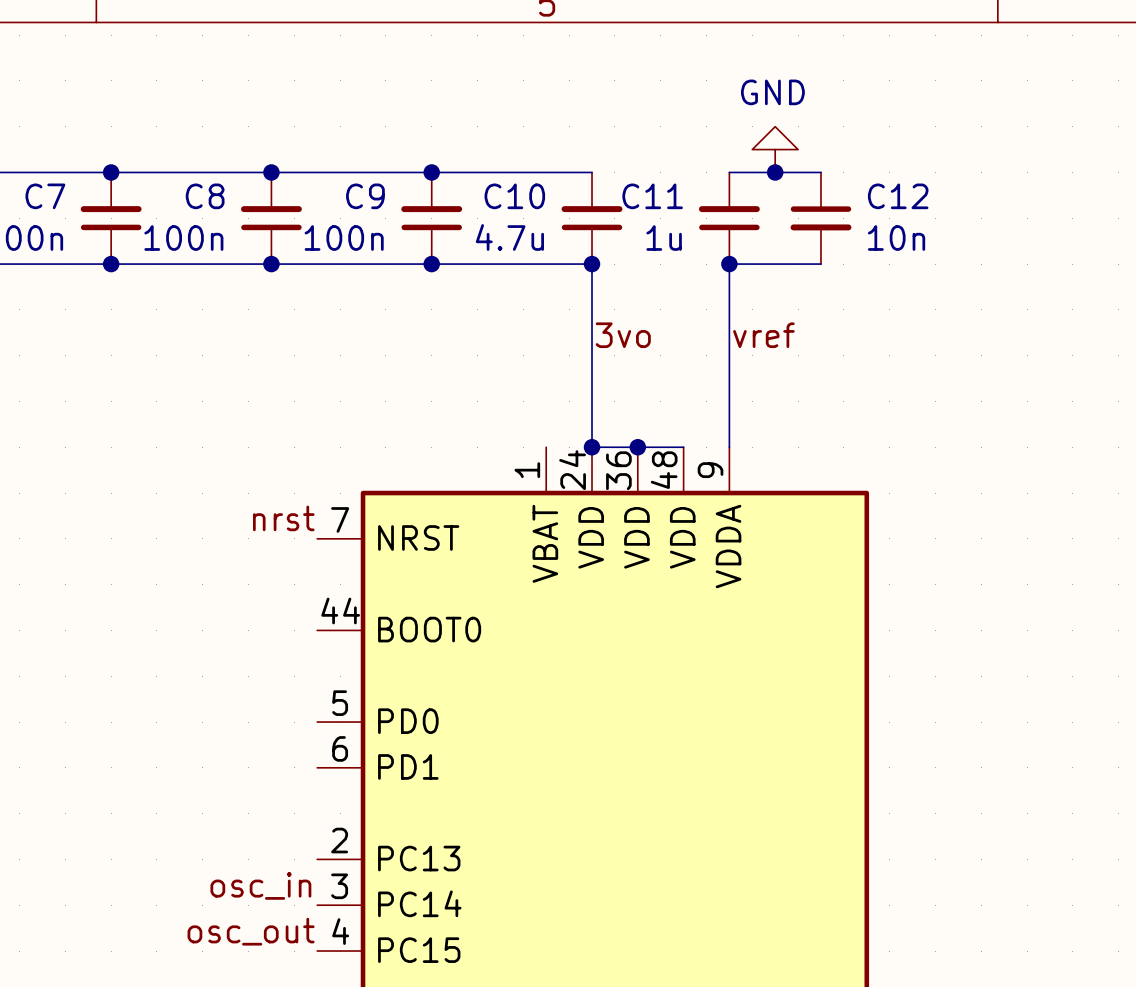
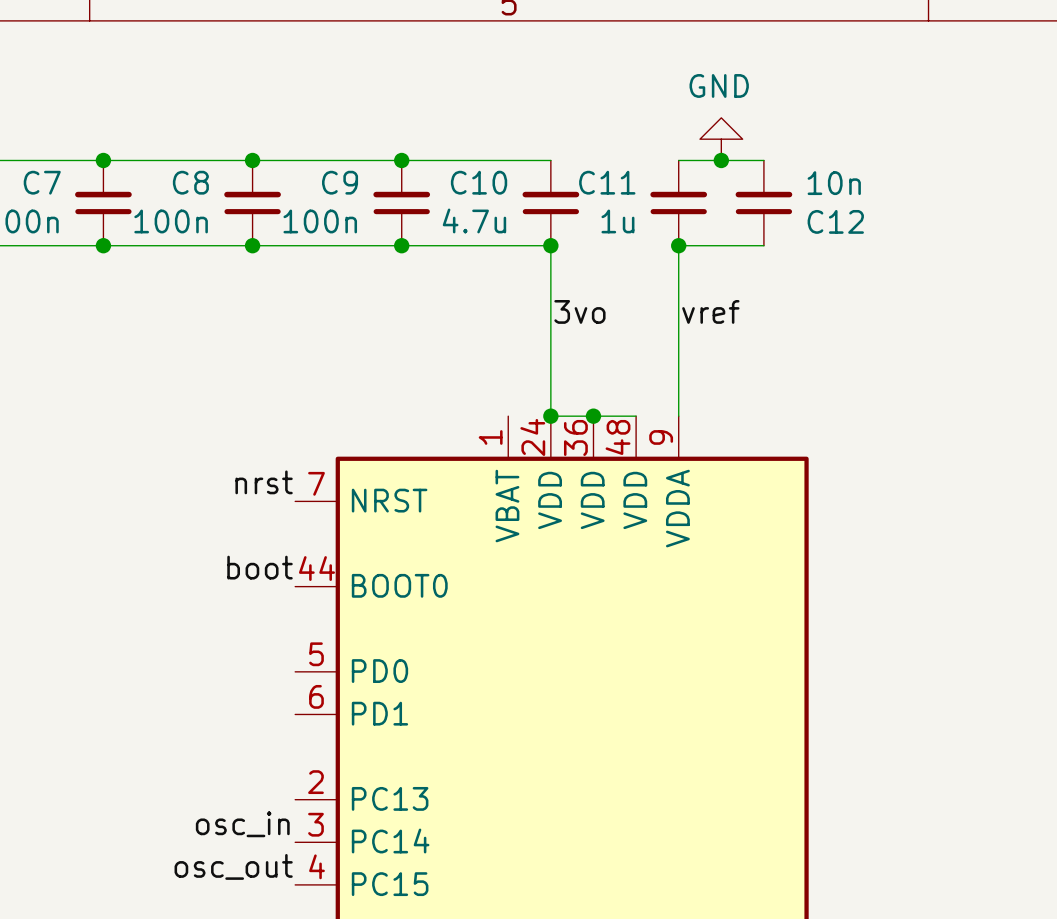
C12 name position: C12 (898, 196) -> C12 (835, 221)
C12 rotation: 0° (820, 218) -> 180° (763, 202)
C12 value position: 10n (896, 238) -> 10n (834, 183)
label: none -> boot (260, 567)

